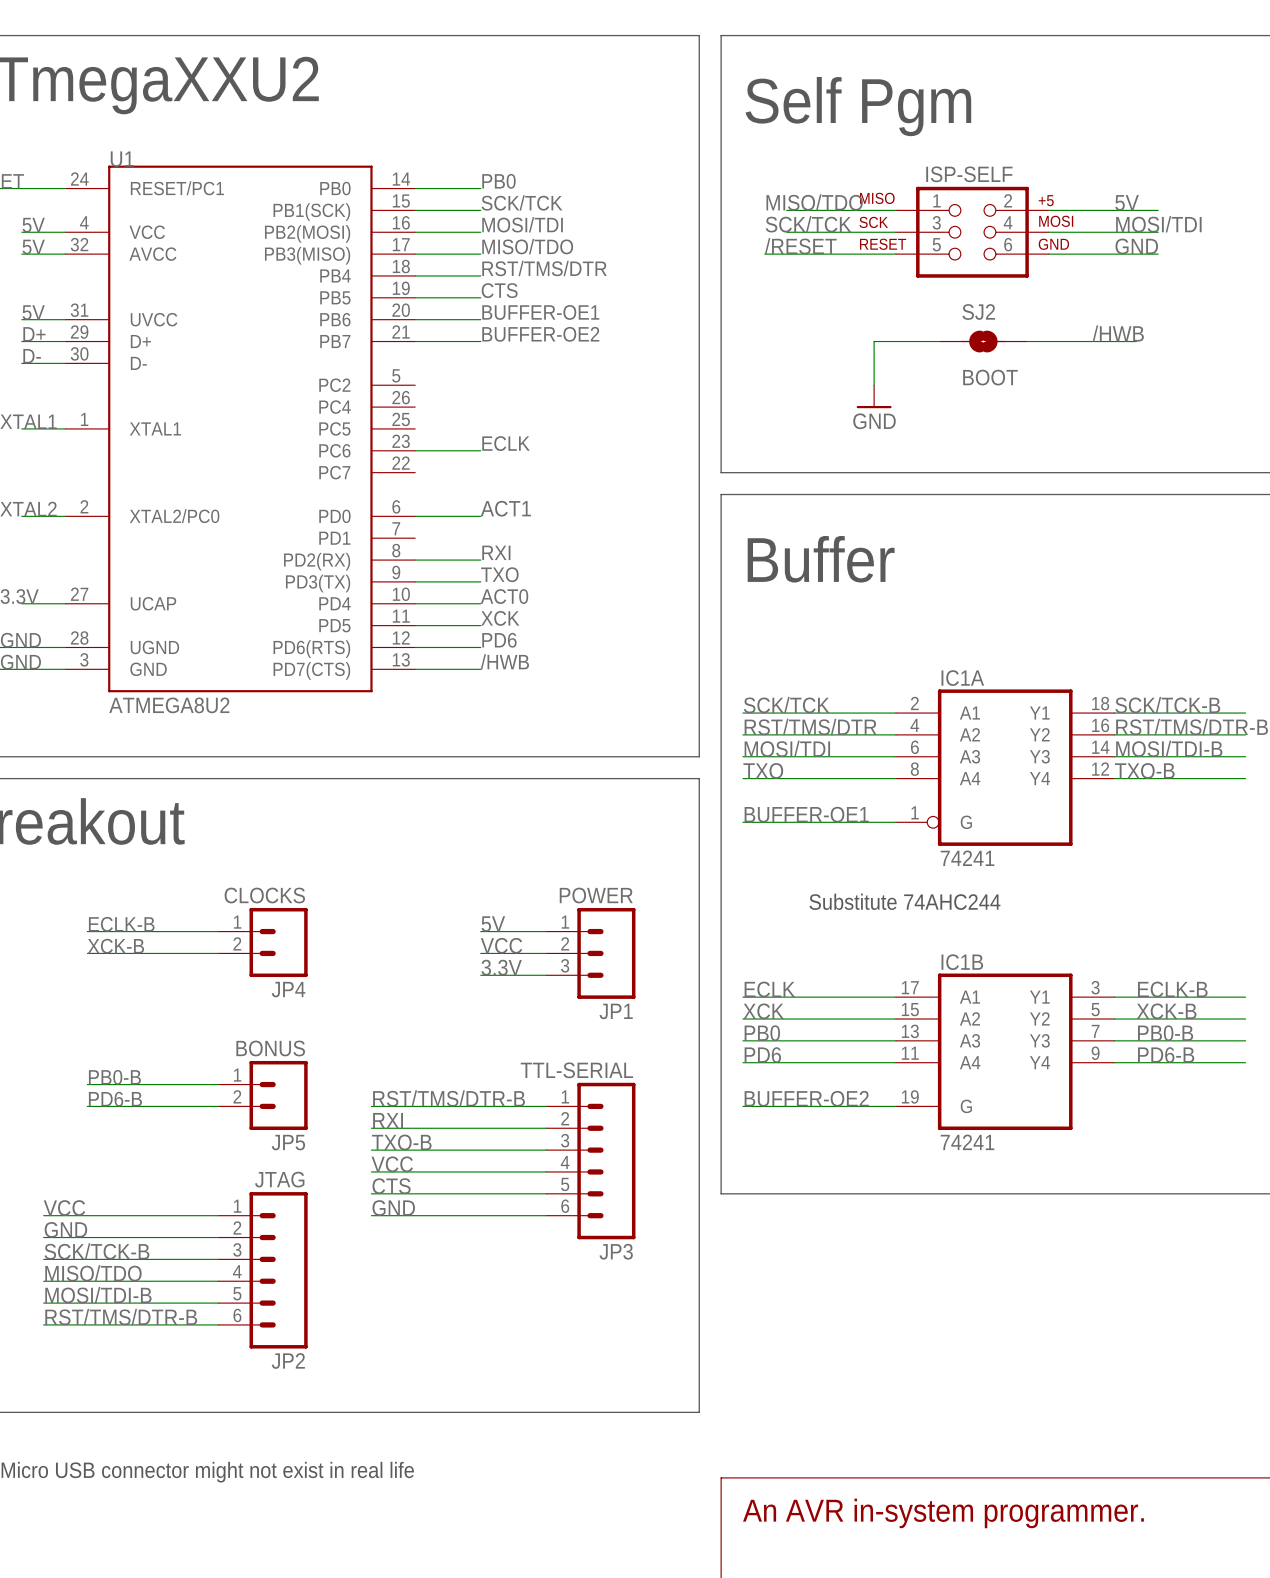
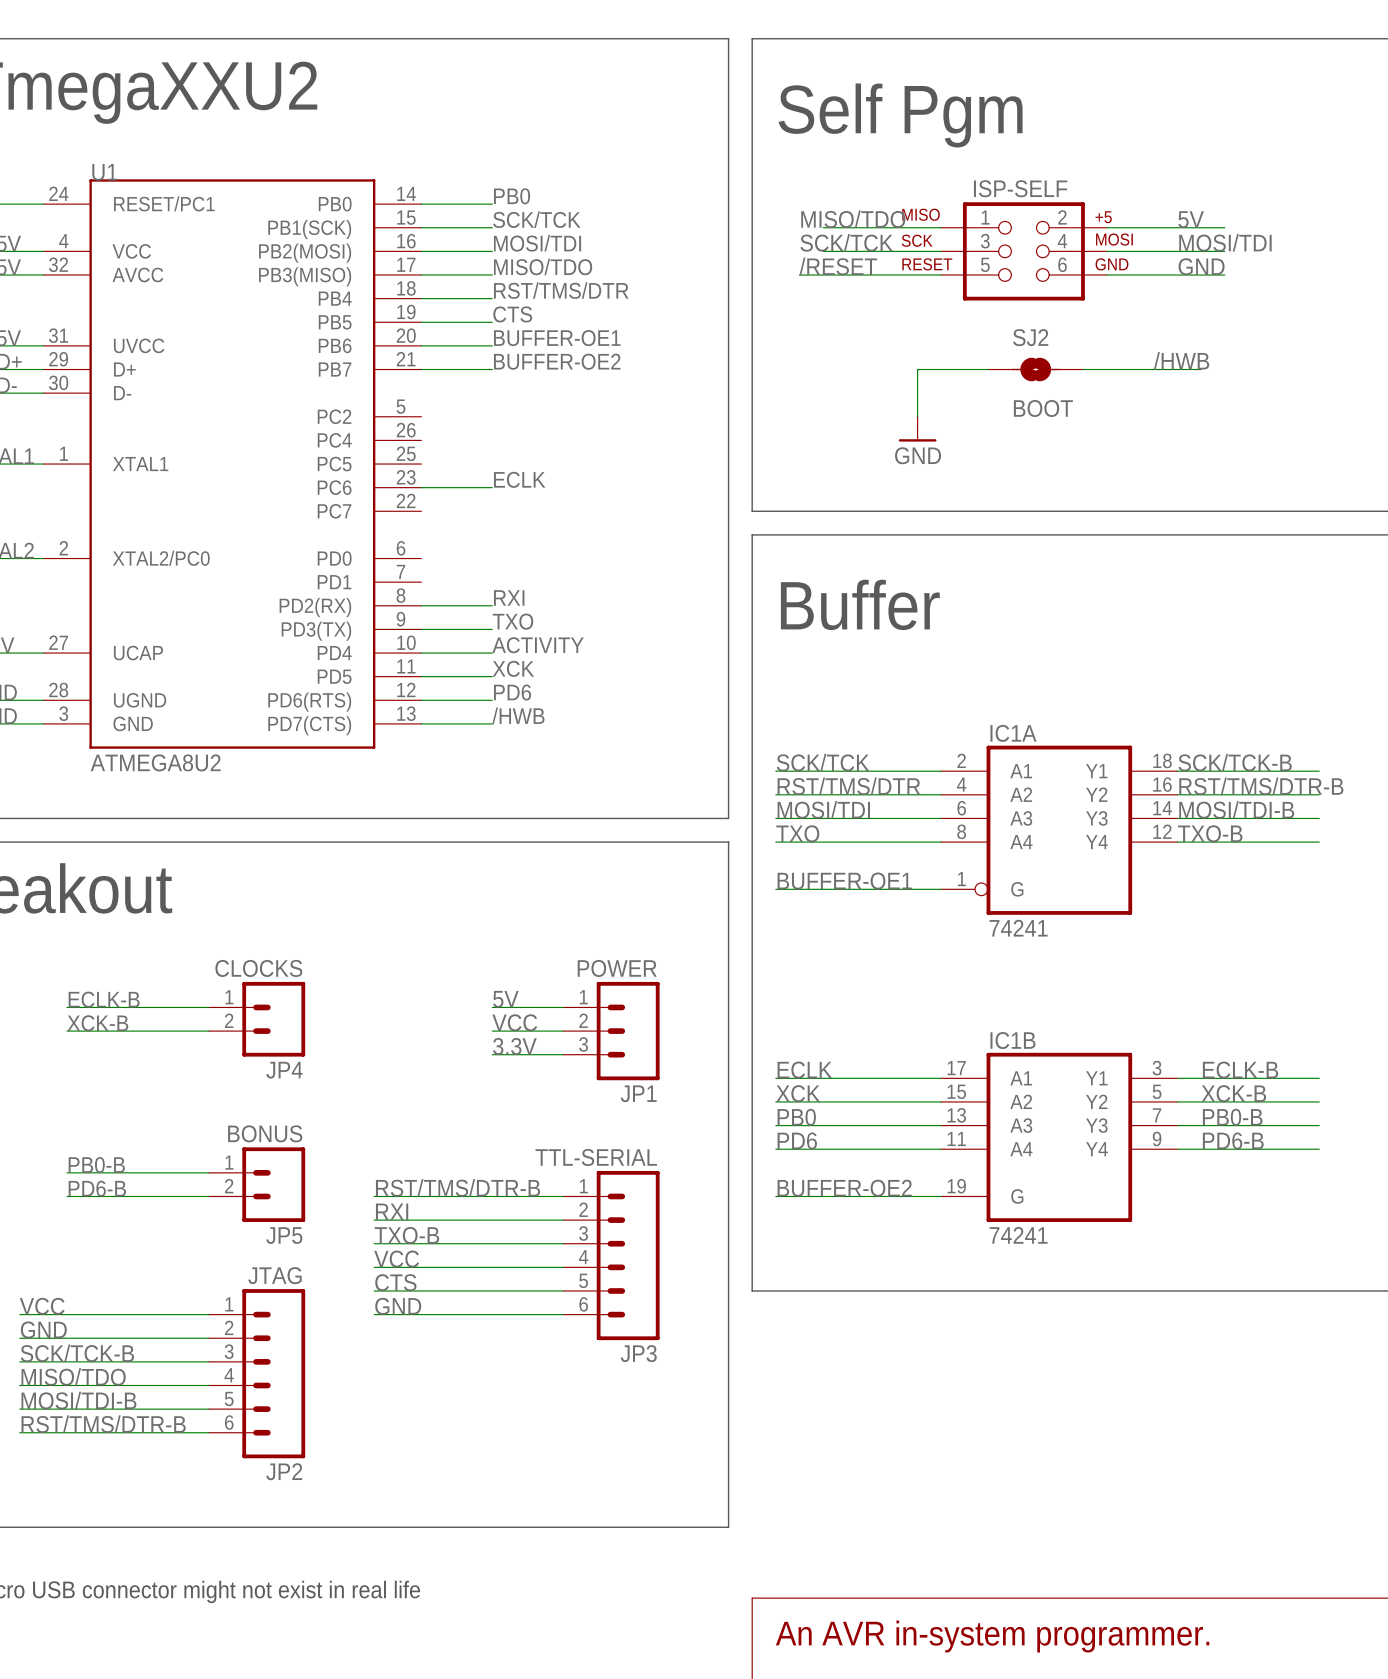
label: ACT1 (505, 508) -> none
wire: (415, 516) (480, 516) -> none
label: ACT0 (504, 596) -> ACTIVITY (538, 645)
text: Substitute 74AHC244 (904, 901) -> none

